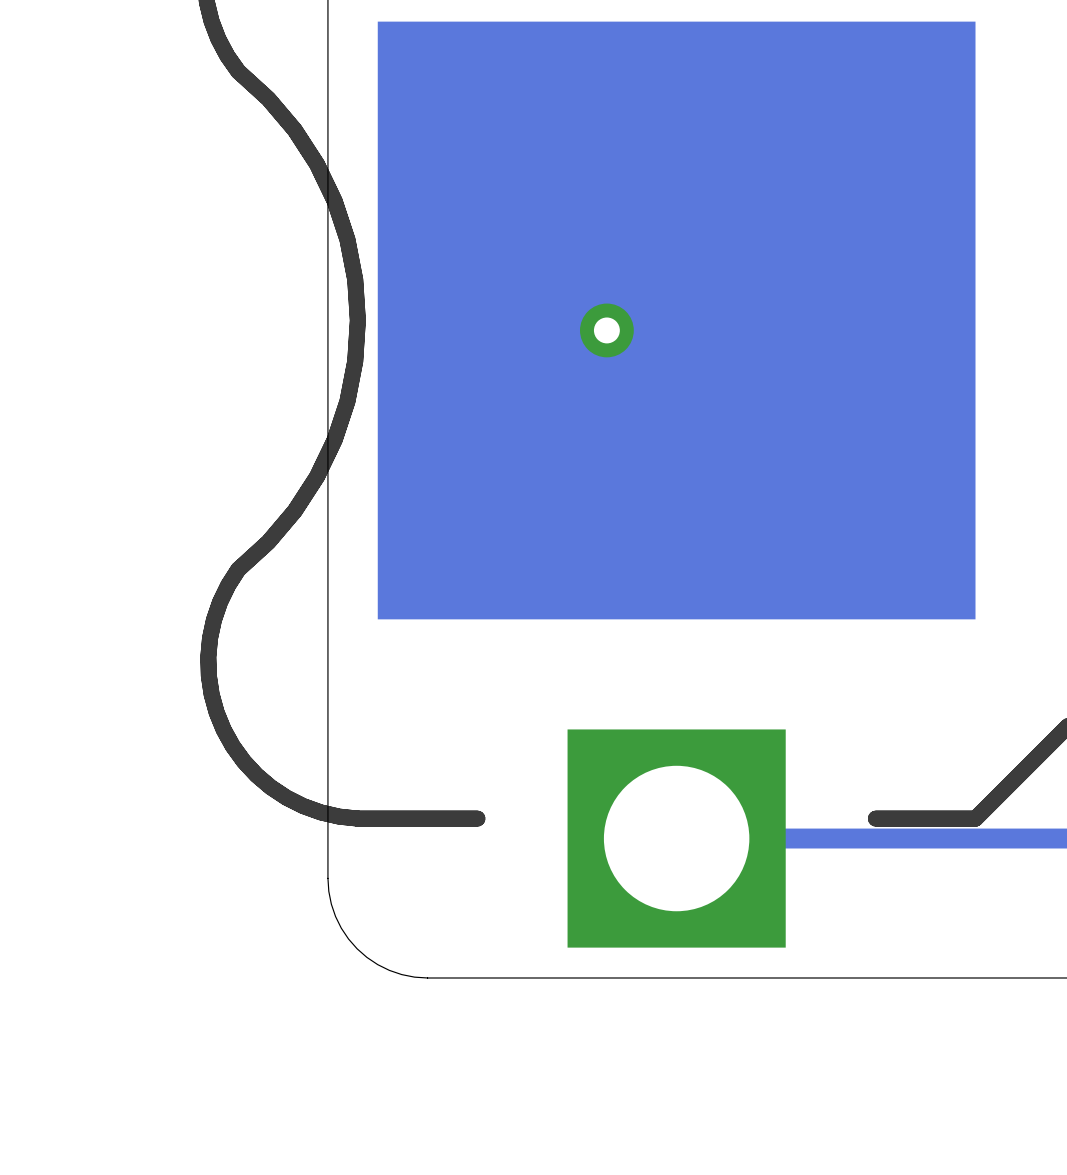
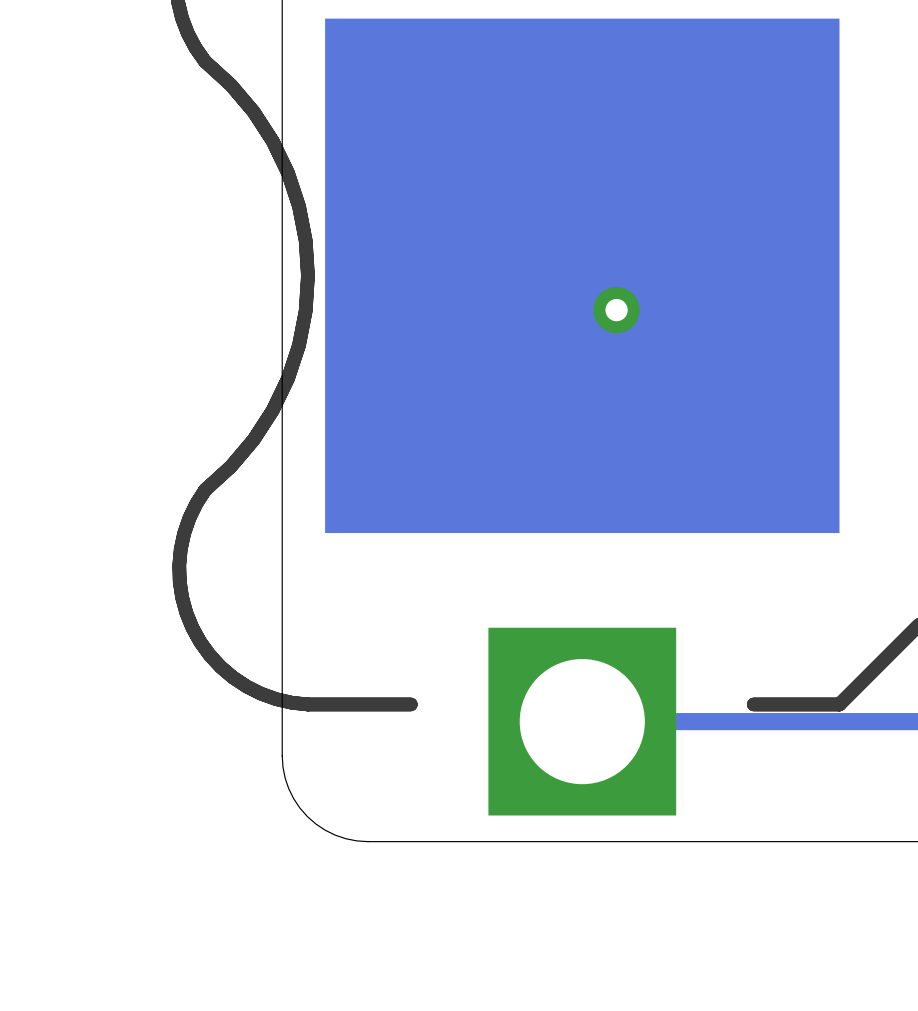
via position: (606, 330) -> (616, 310)

